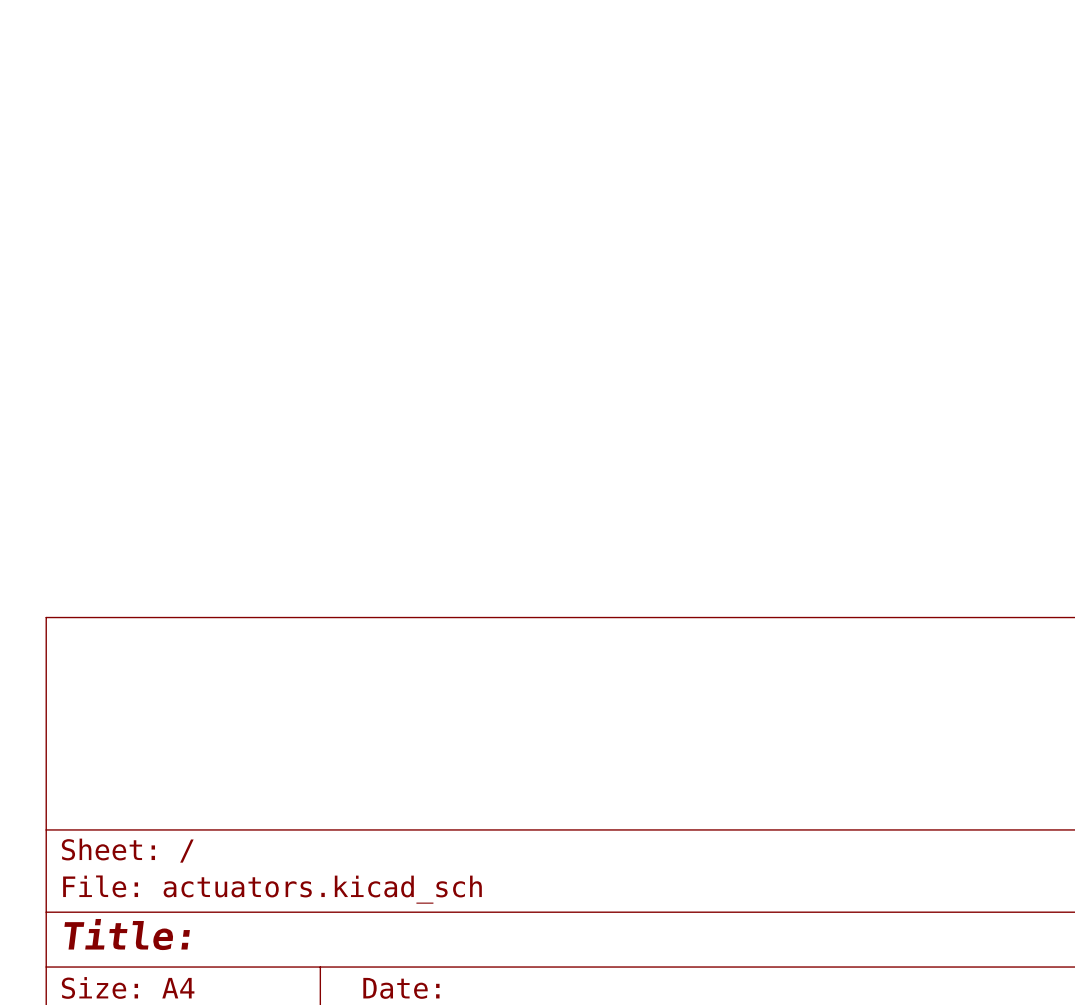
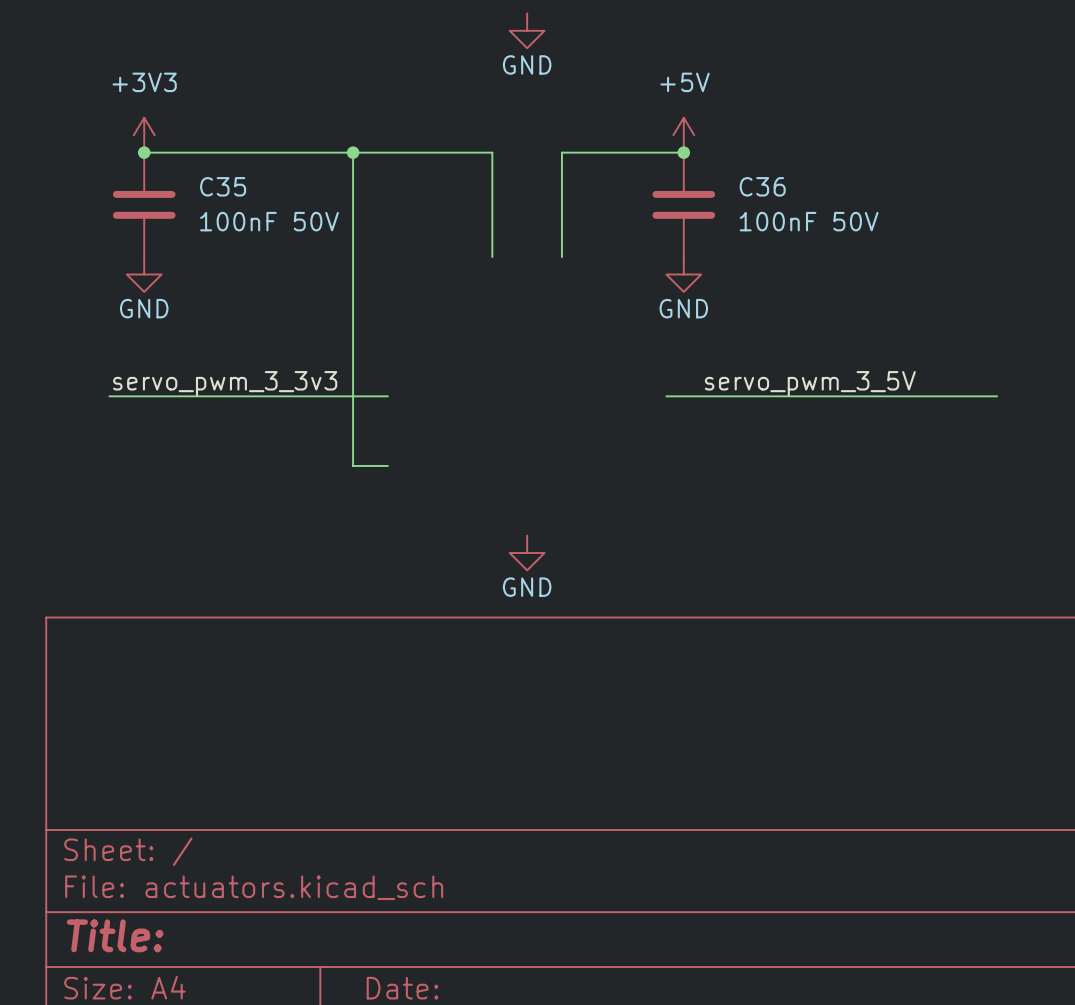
power symbol: none -> GND (527, 30)
power symbol: none -> +3V3 (144, 135)
power symbol: none -> +5V (683, 135)
wire: none -> (144, 152) (492, 152) (492, 257)
junction: none -> (144, 152)
wire: none -> (353, 152) (353, 465) (387, 465)
junction: none -> (353, 152)
wire: none -> (683, 152) (561, 152) (561, 257)
junction: none -> (683, 152)
C35: none -> 100nF 50V (144, 204)
C36: none -> 100nF 50V (683, 204)
power symbol: none -> GND (144, 274)
power symbol: none -> GND (683, 274)
label: none -> servo_pwm_3_3v3 (225, 383)
label: none -> servo_pwm_3_5V (810, 383)
wire: none -> (109, 396) (387, 396)
wire: none -> (666, 396) (997, 396)
power symbol: none -> GND (527, 552)

